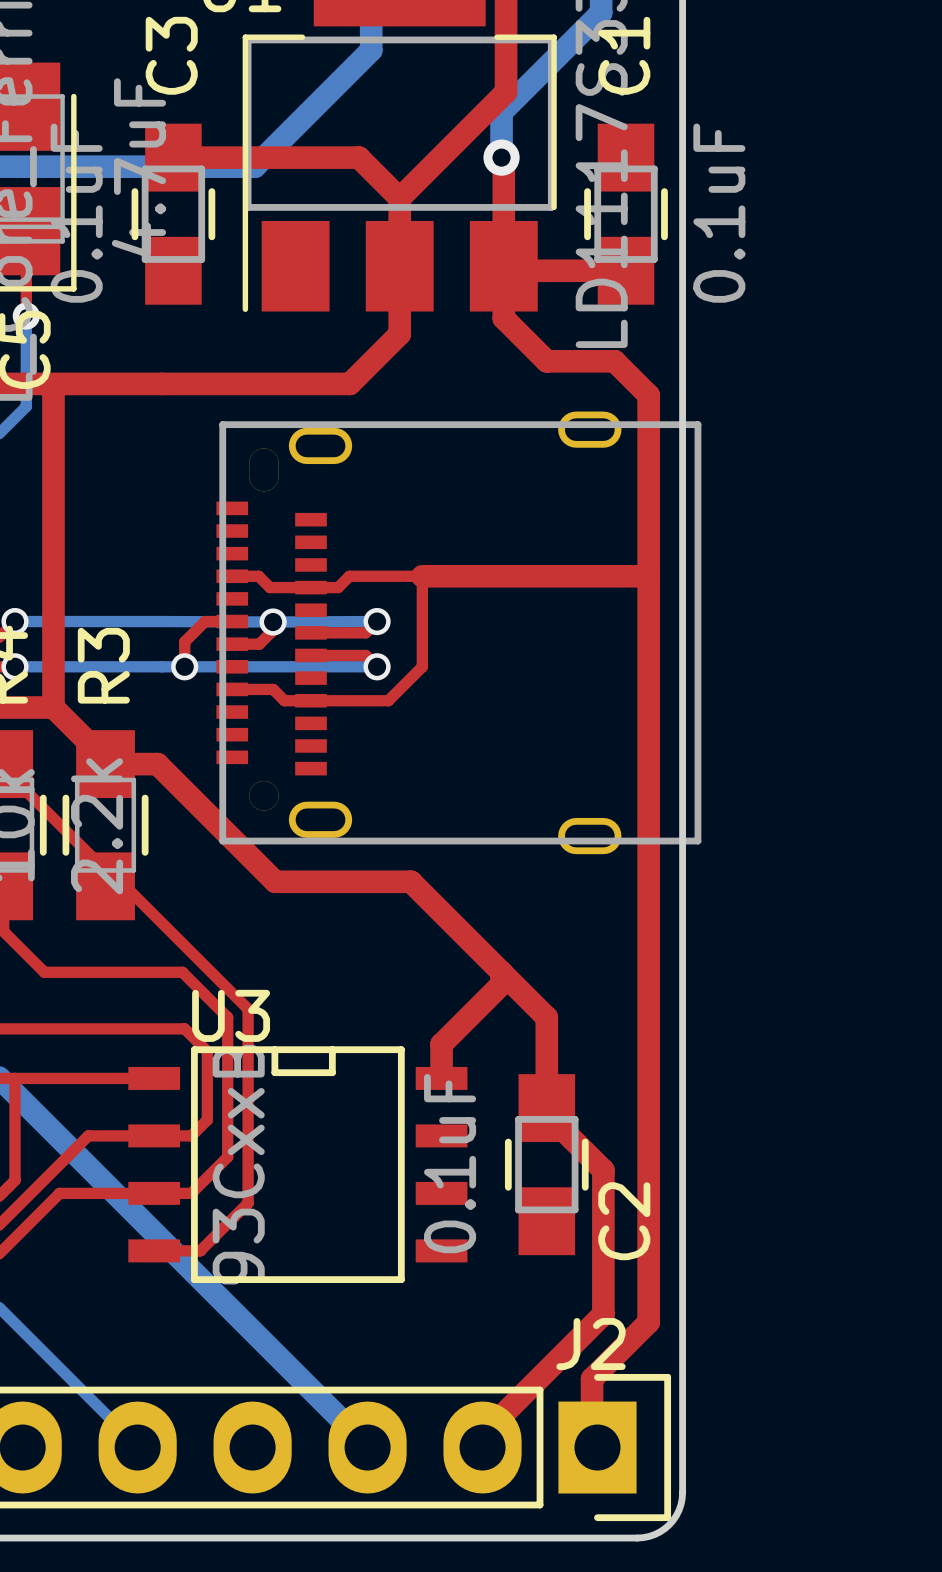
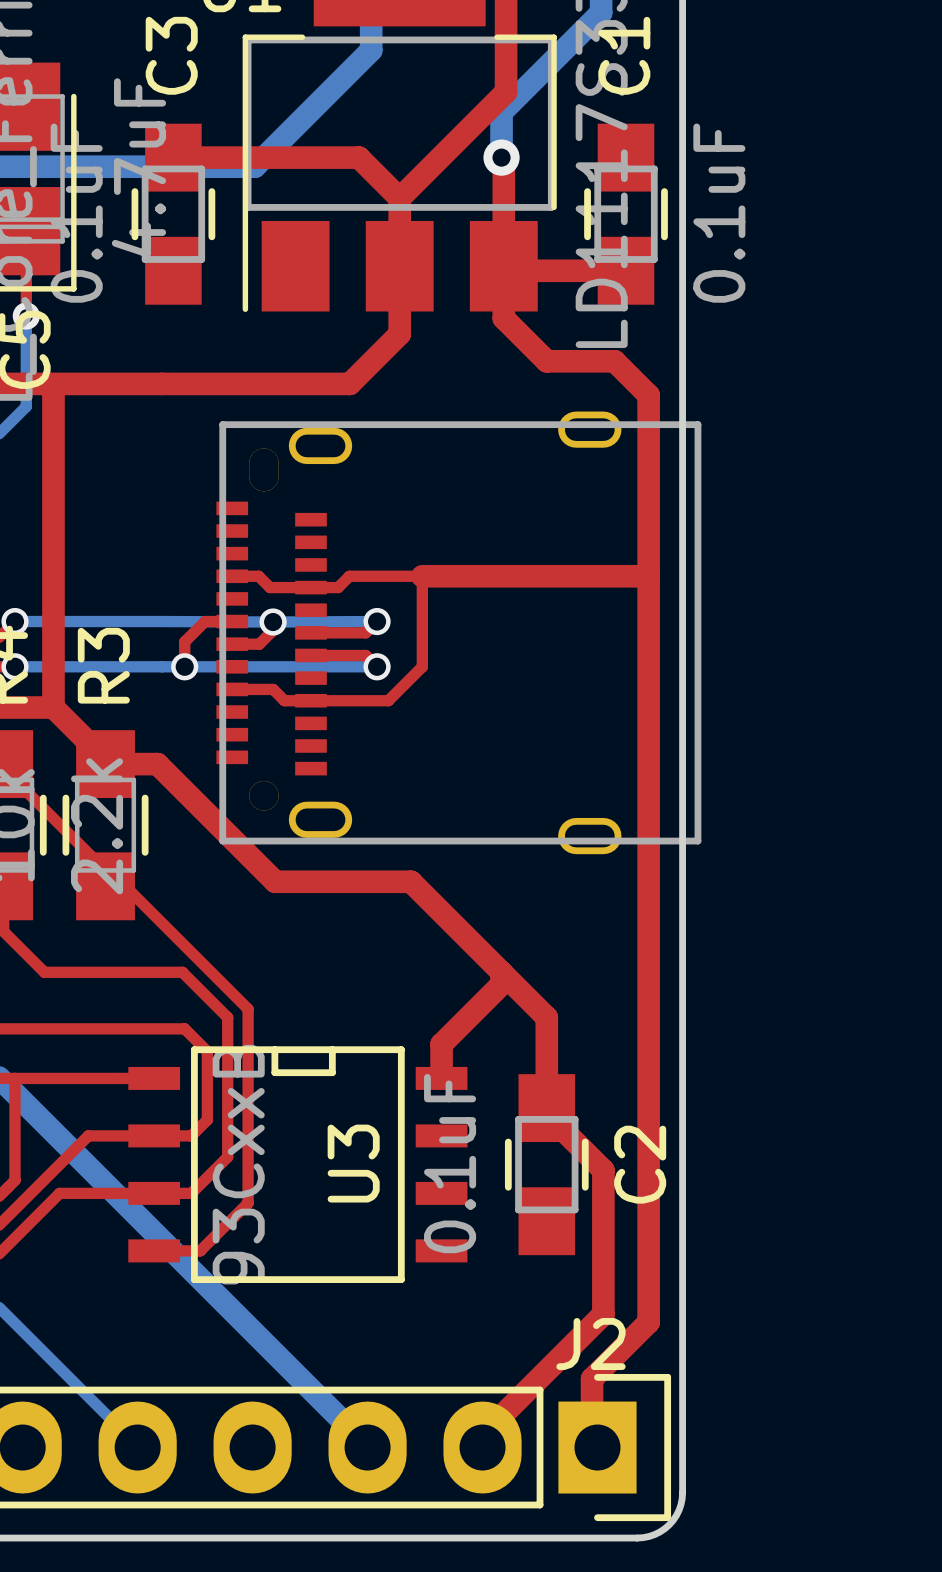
U3 name rotation: 0° (231, 1015) -> 90° counterclockwise (353, 1163)
U3 name position: U3 (231, 1015) -> U3 (353, 1163)
C2 name position: C2 (624, 1221) -> C2 (640, 1164)

